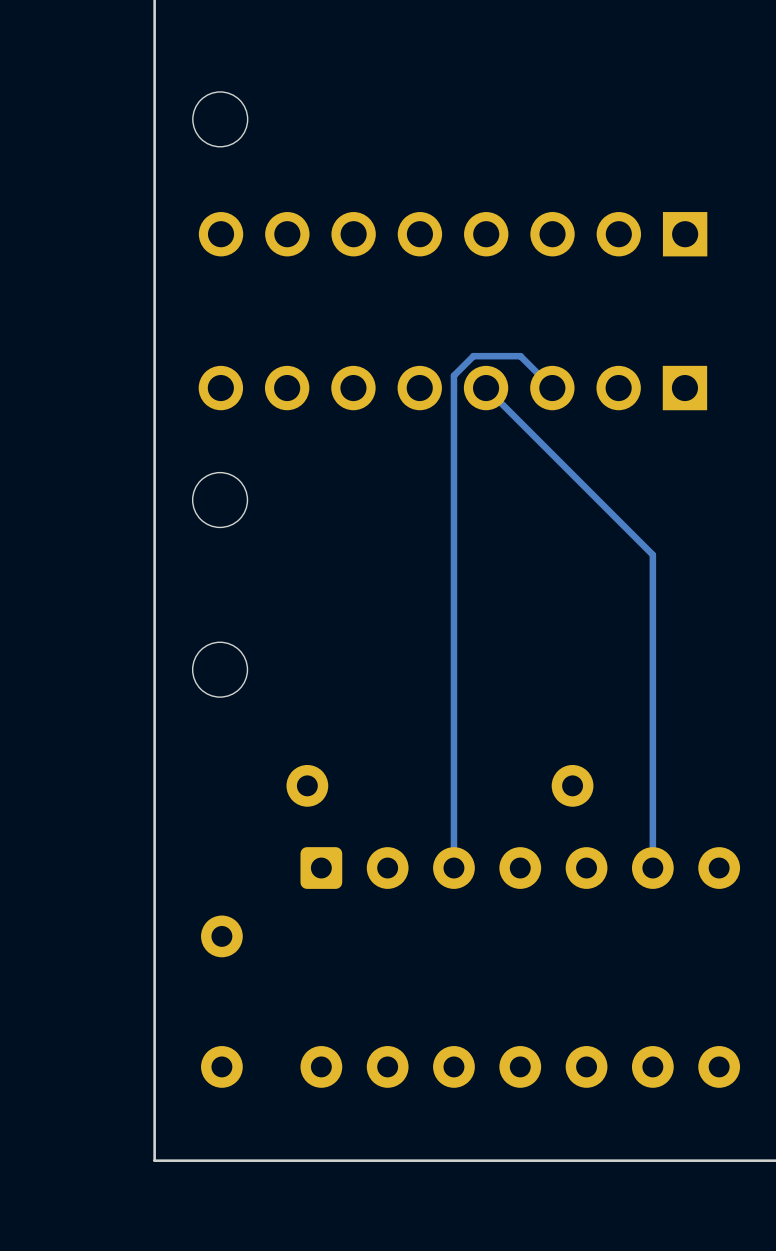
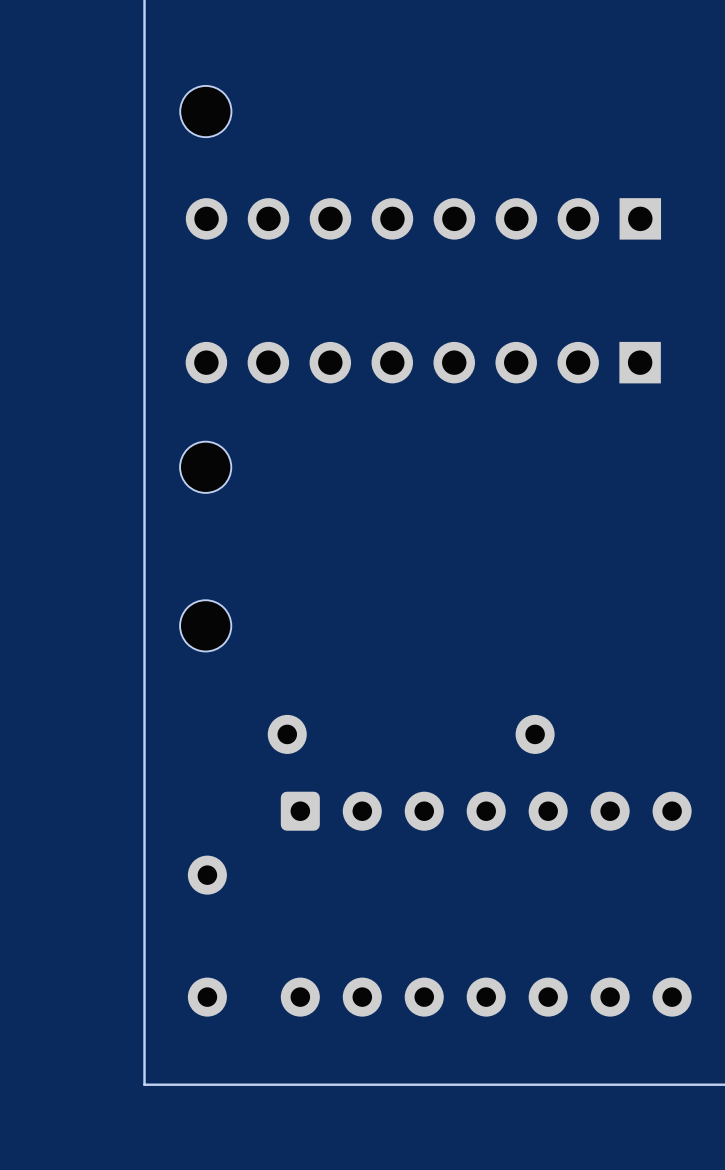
track: (486, 388) (652, 554) (652, 868) -> none
track: (552, 388) (520, 356) (473, 356) (453, 375) (453, 868) -> none

